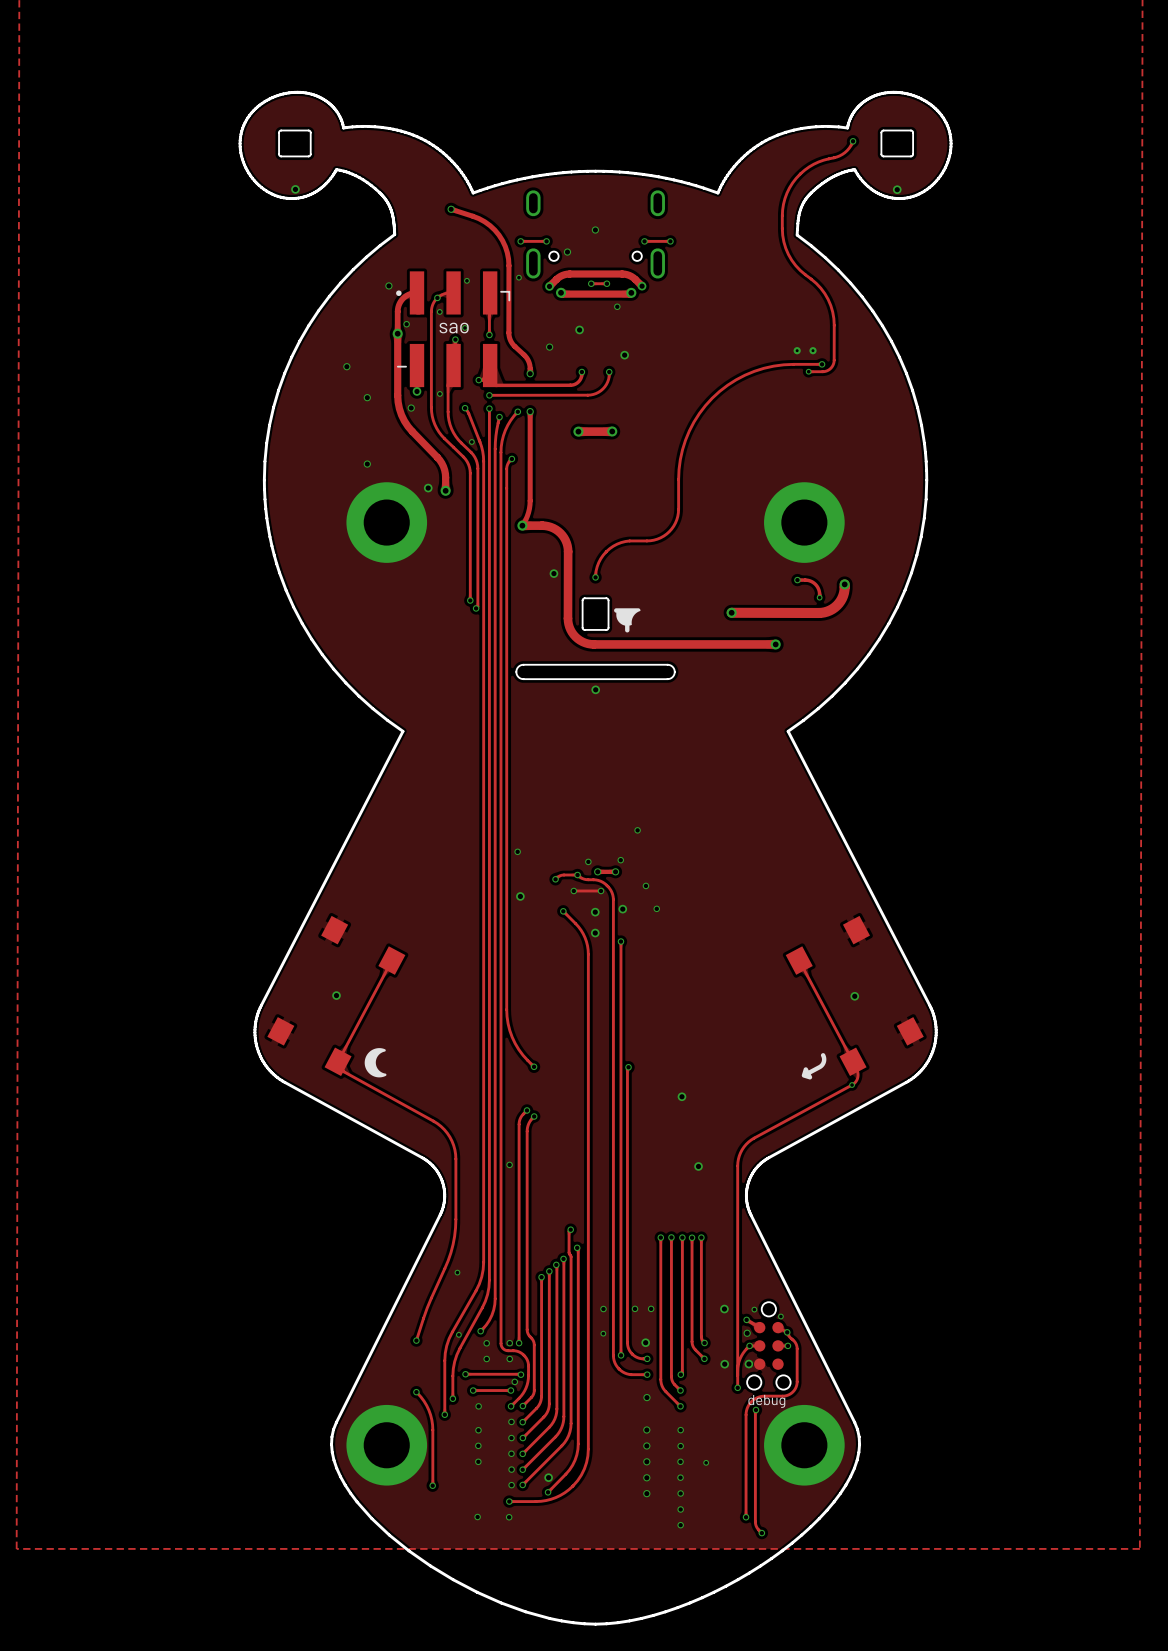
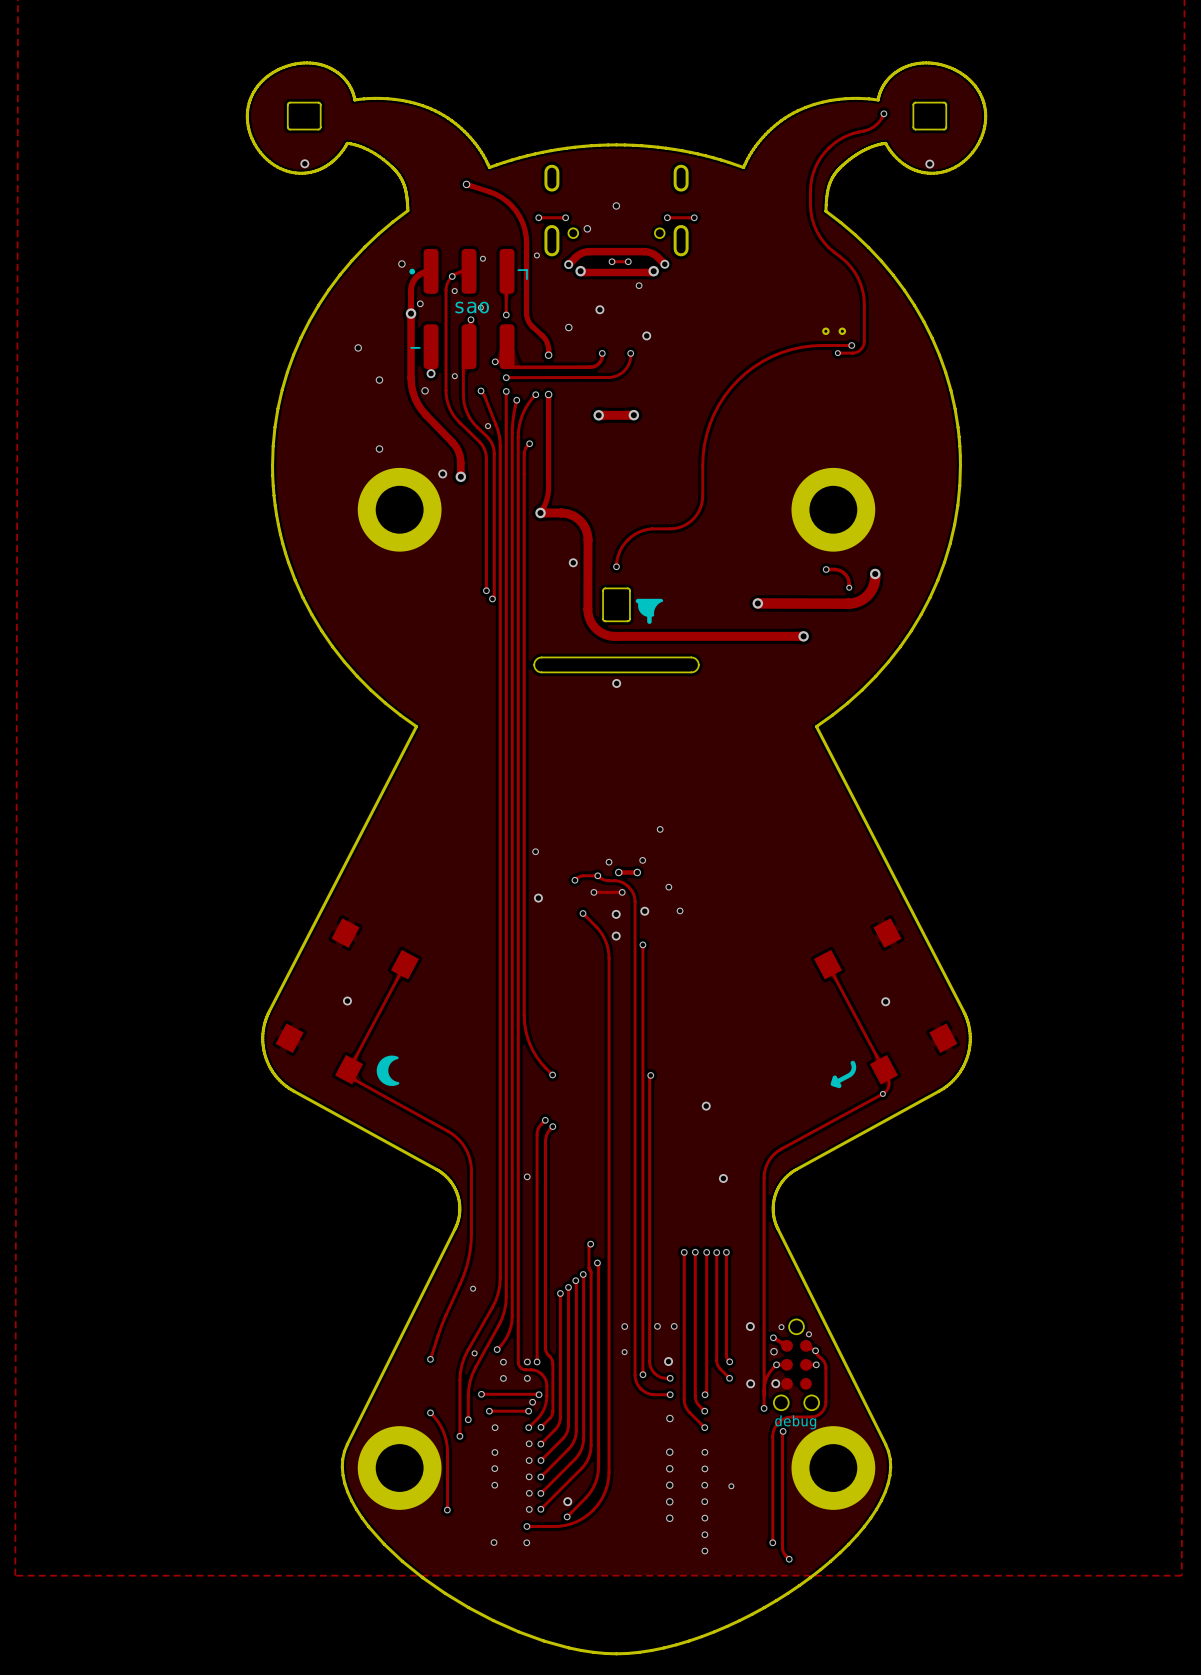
part footprint: [396, 271, 511, 388] -> [409, 248, 528, 370]

